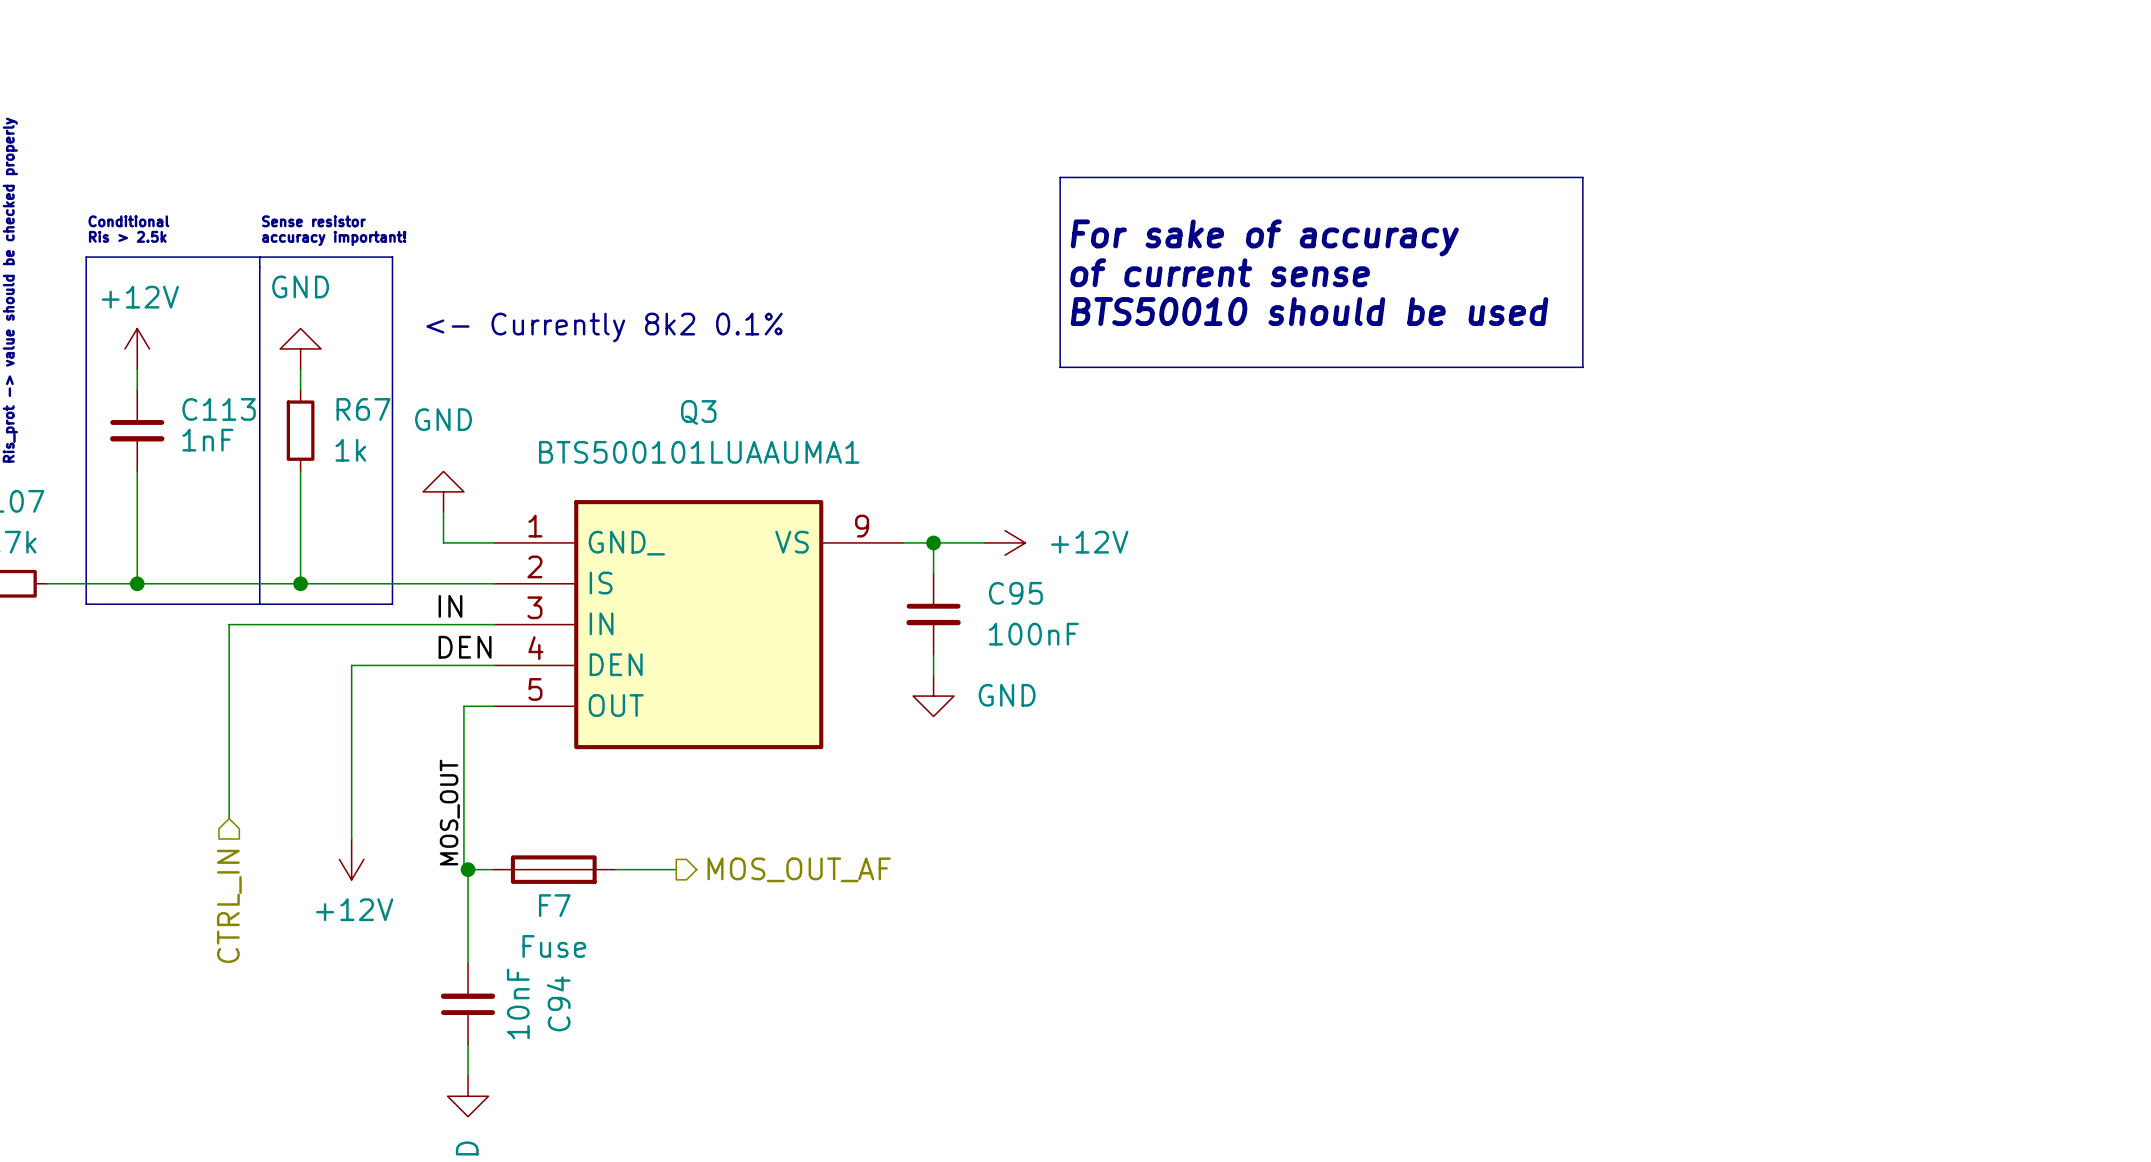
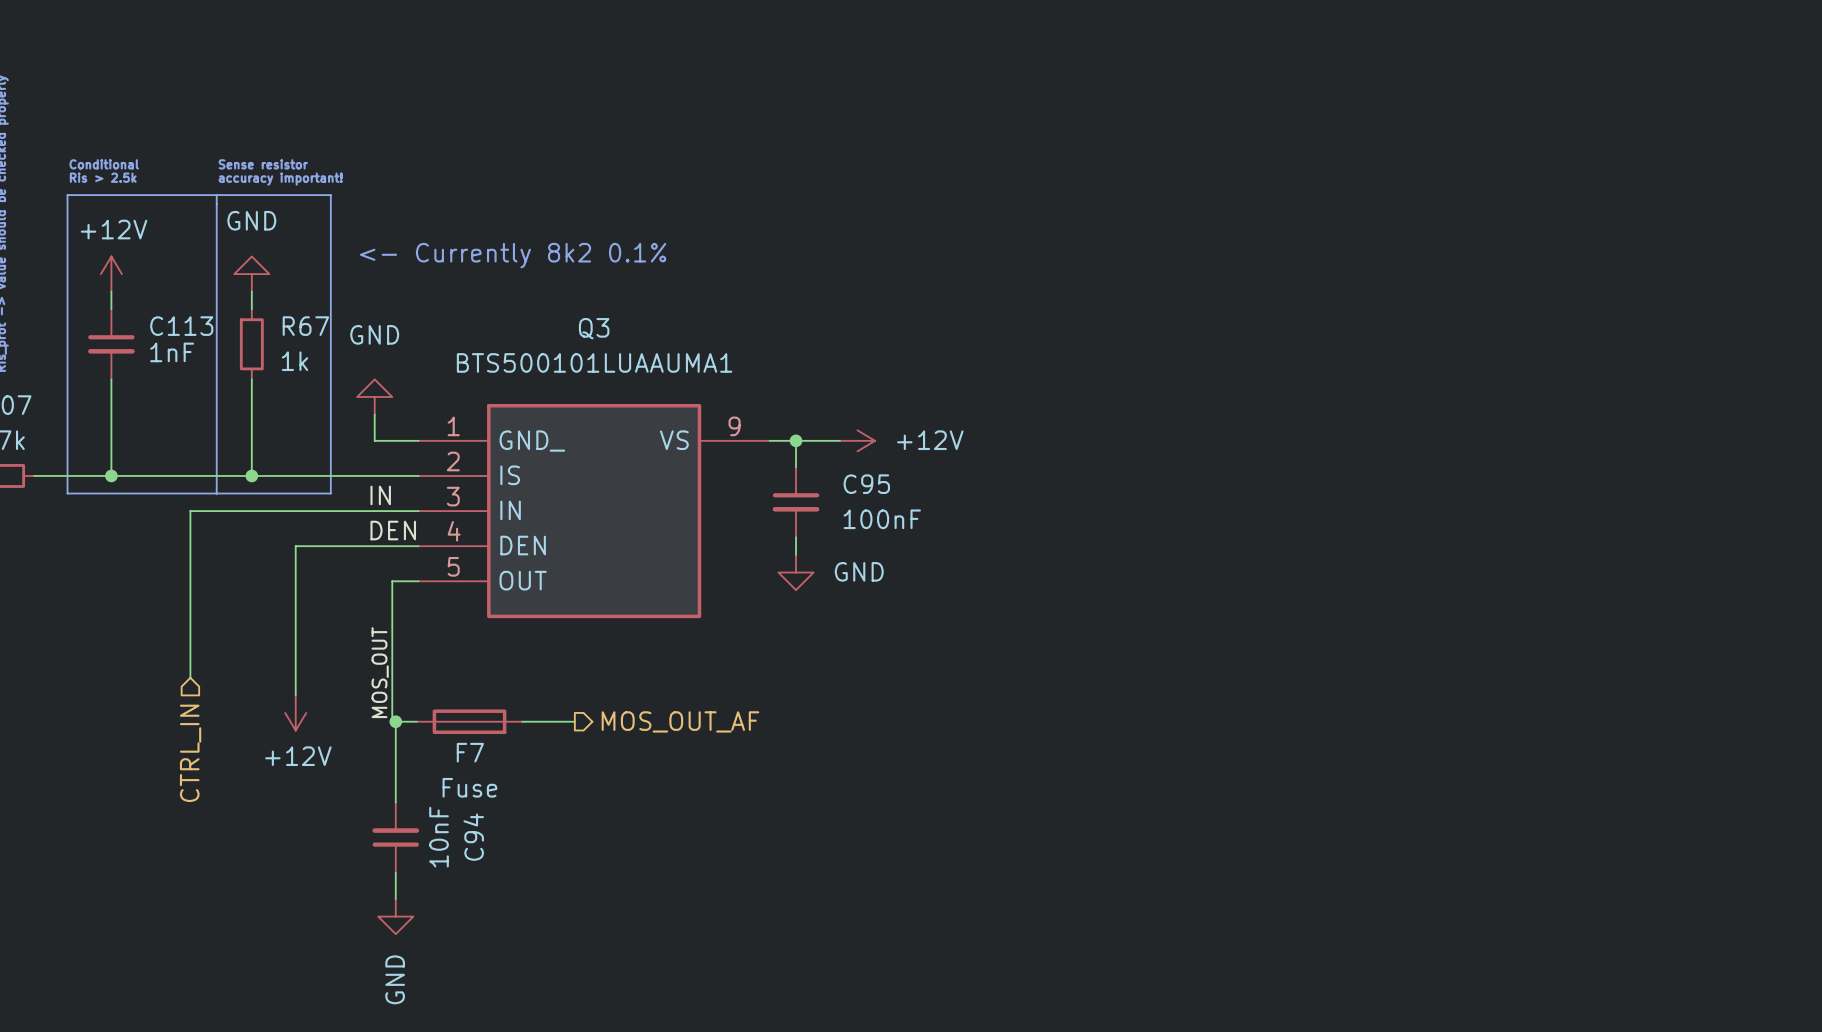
line: (1060, 177) (1582, 177) (1582, 367) (1060, 367) (1060, 177) -> none
text: For sake of accuracy (1264, 237) -> none
text: of current sense (1220, 272) -> none
text: BTS50010 should be used (1309, 311) -> none

